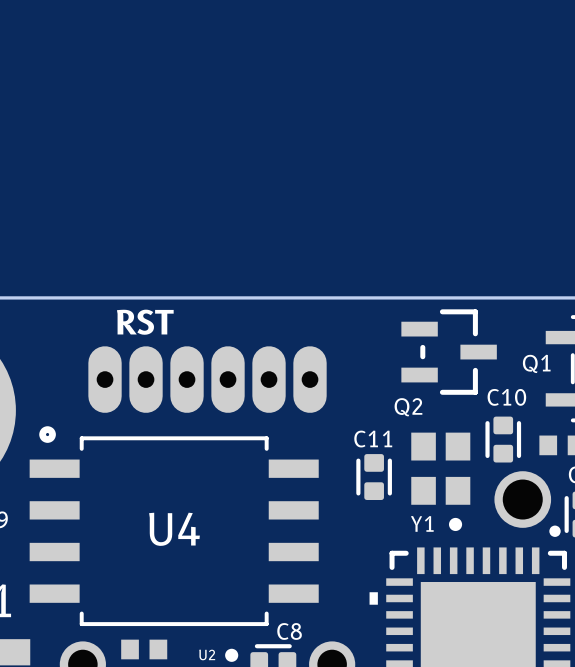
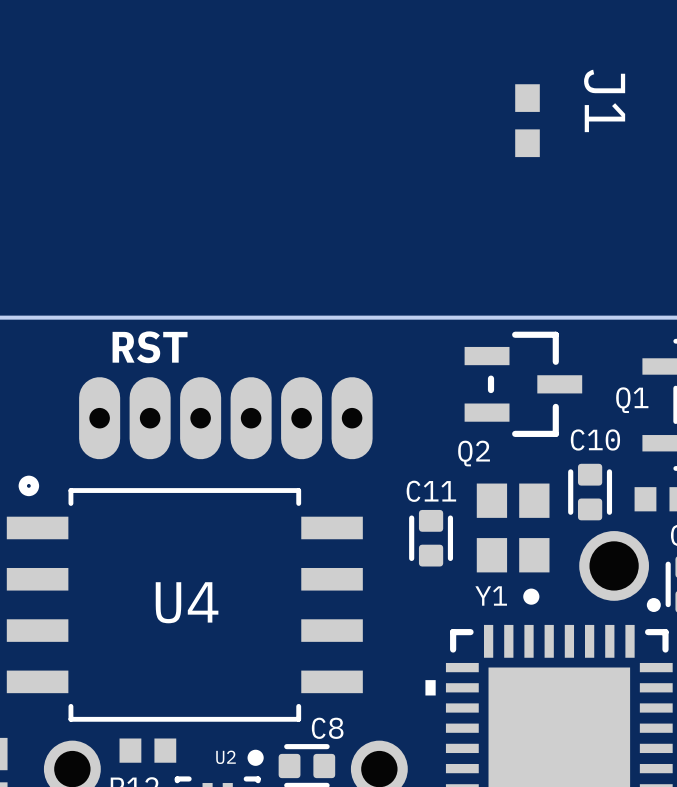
J1: none -> (527, 120)

